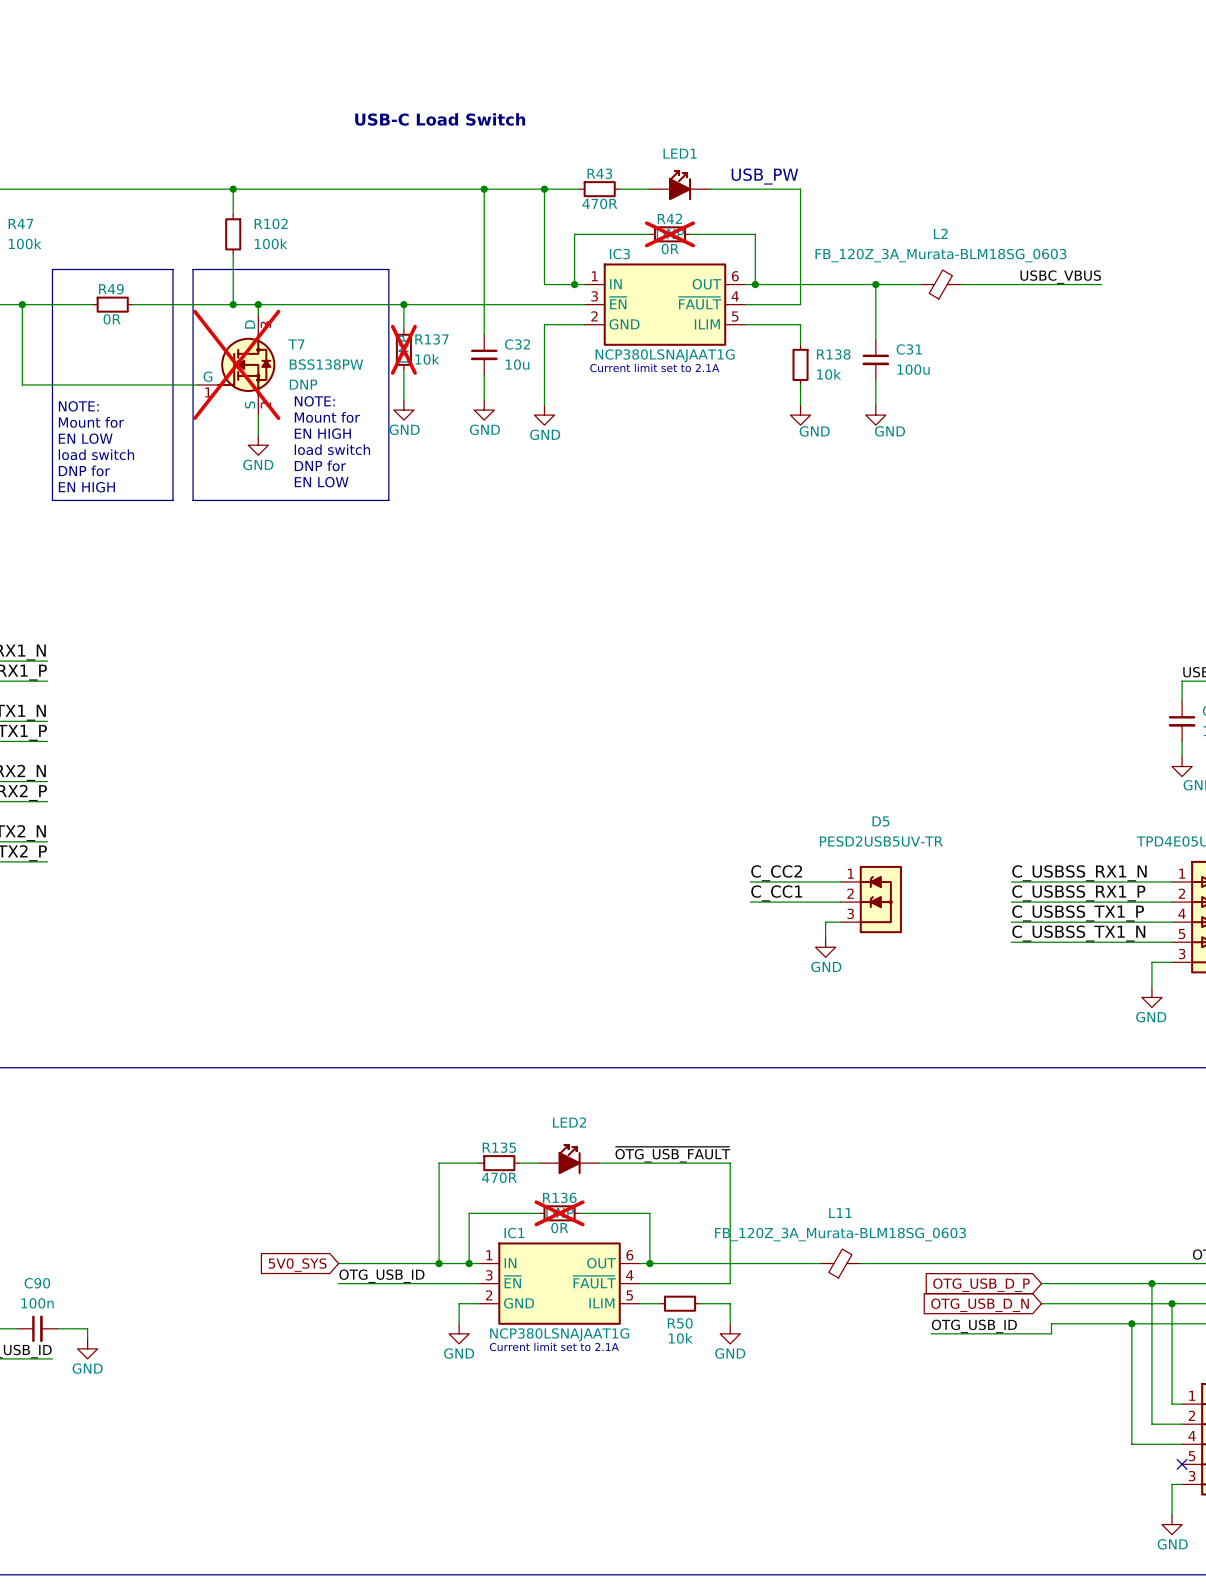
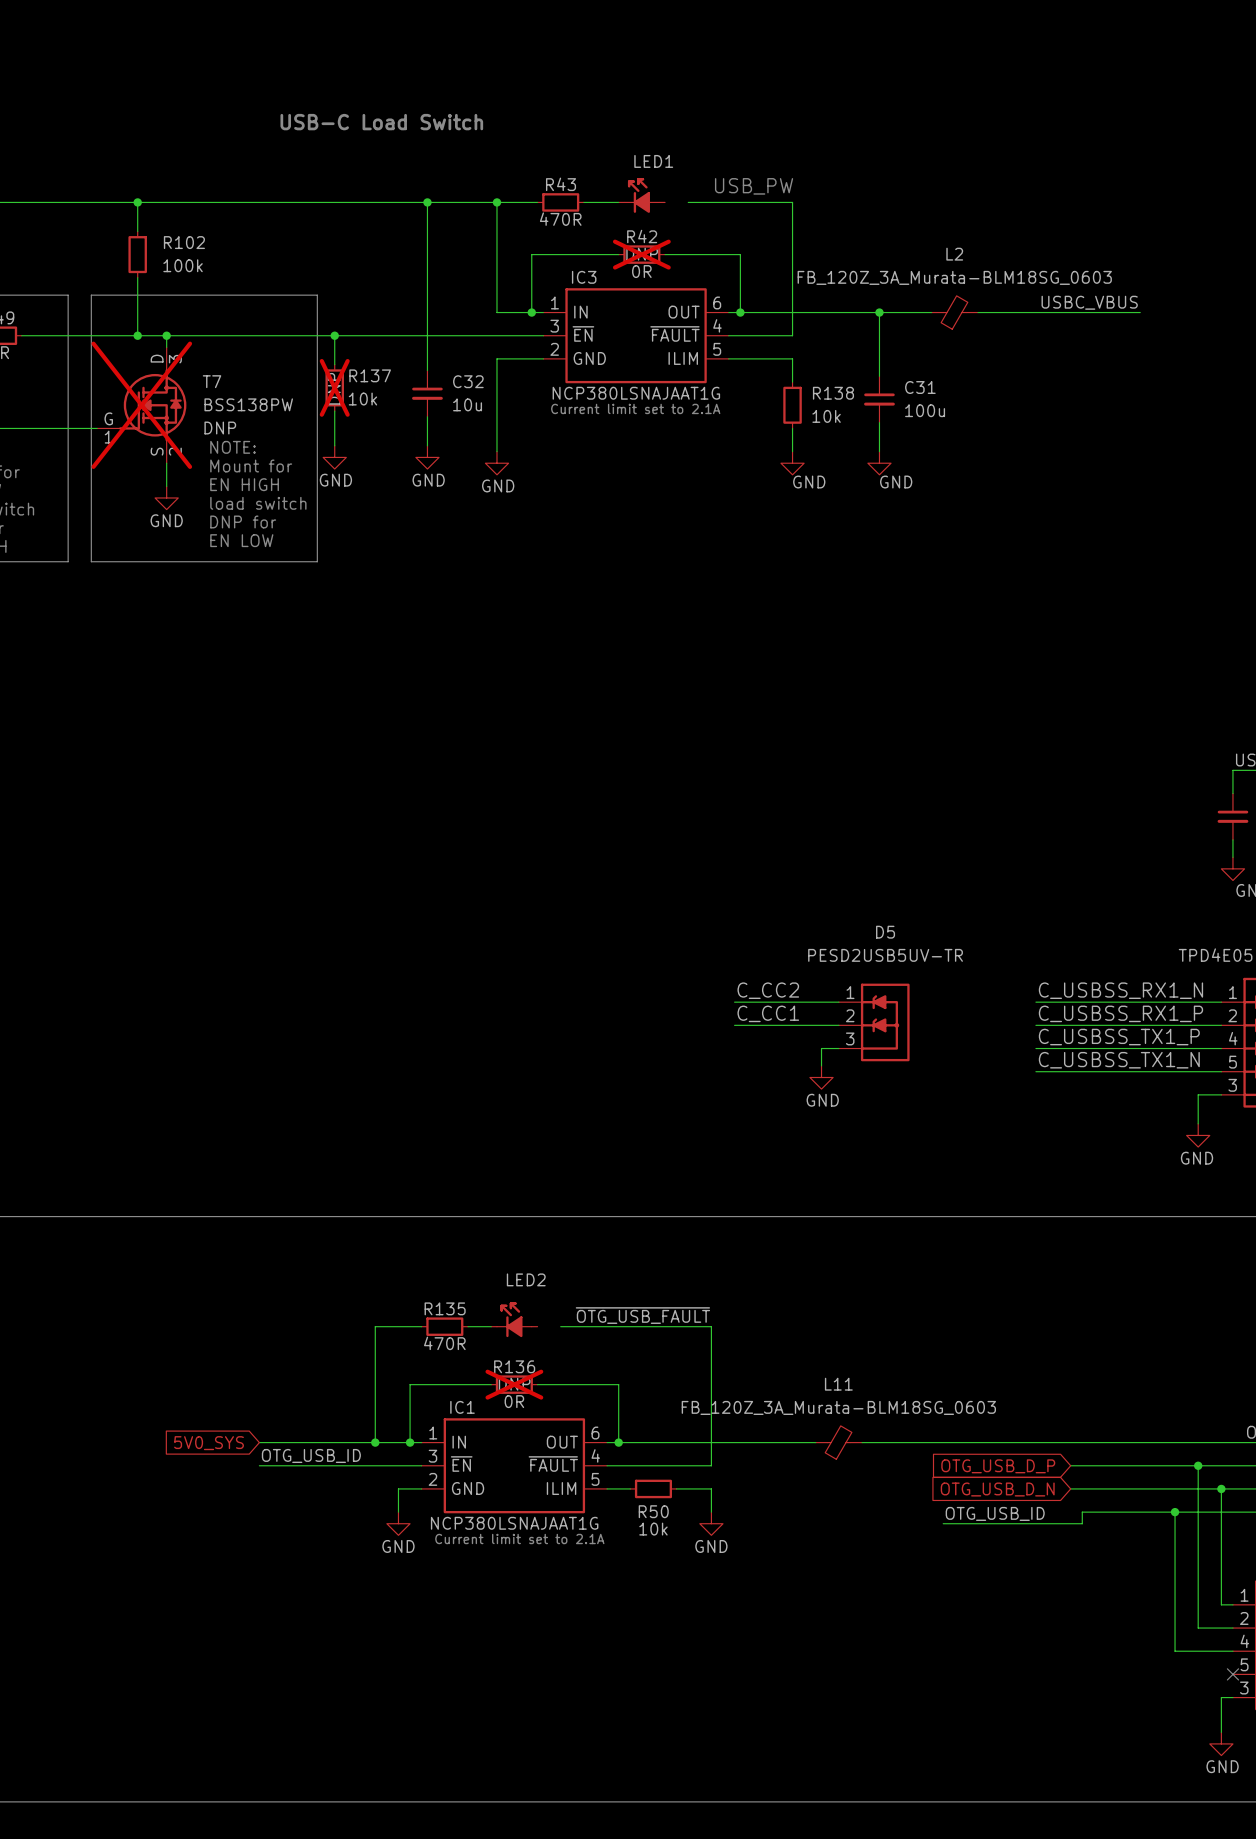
LED1 symbol: [649, 170, 711, 201] -> [618, 178, 666, 213]
LED2 symbol: [539, 1144, 600, 1175] -> [491, 1302, 538, 1338]

